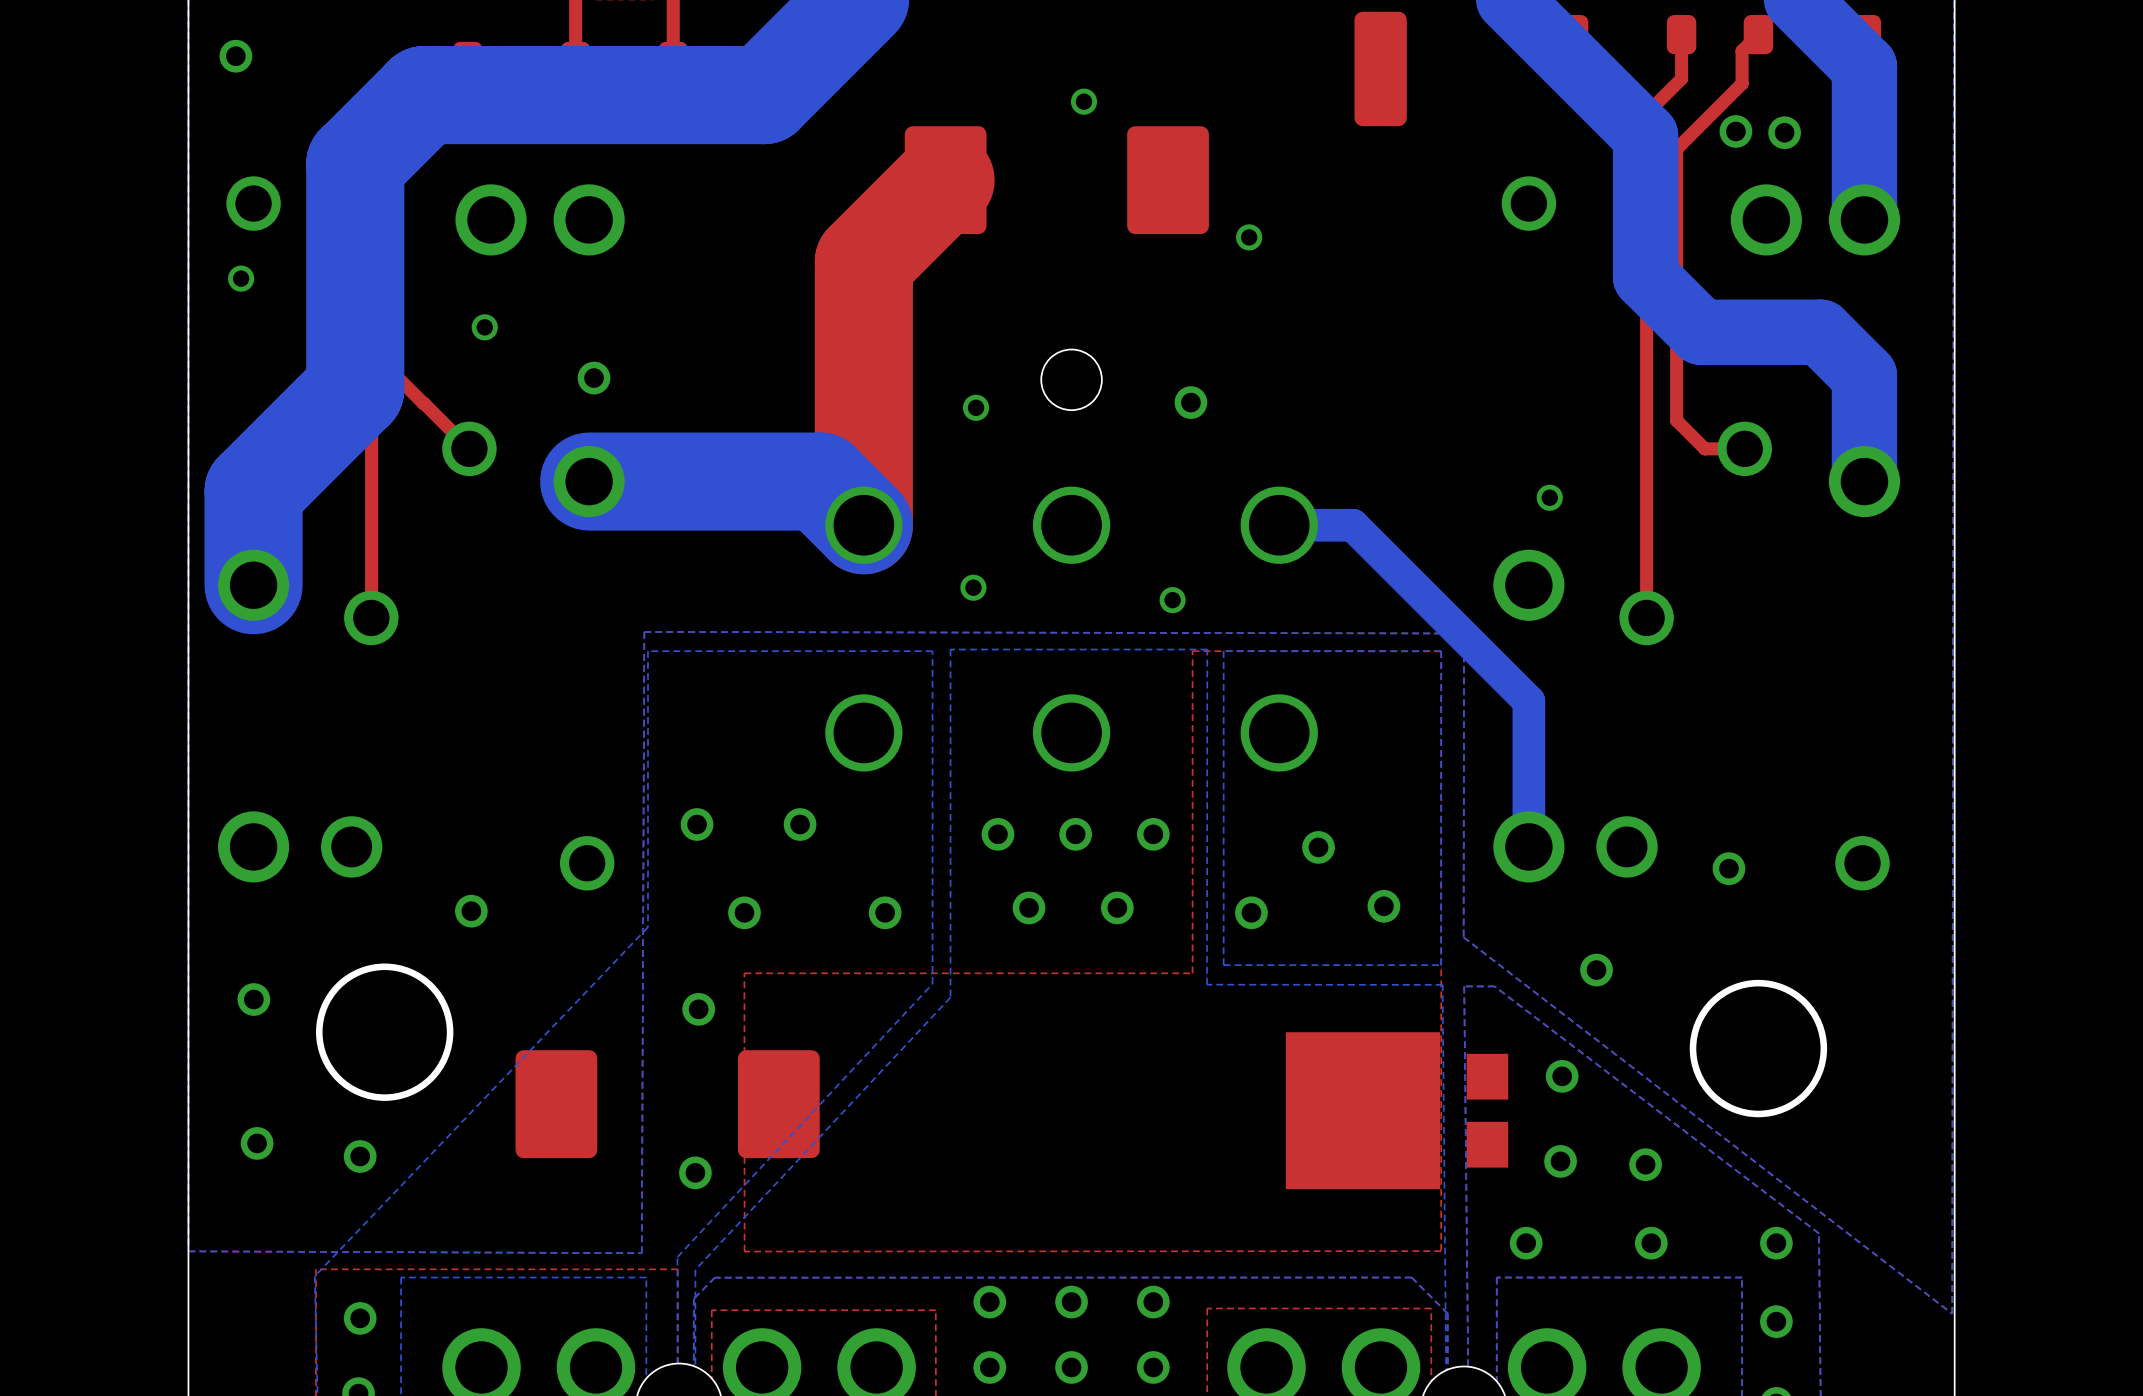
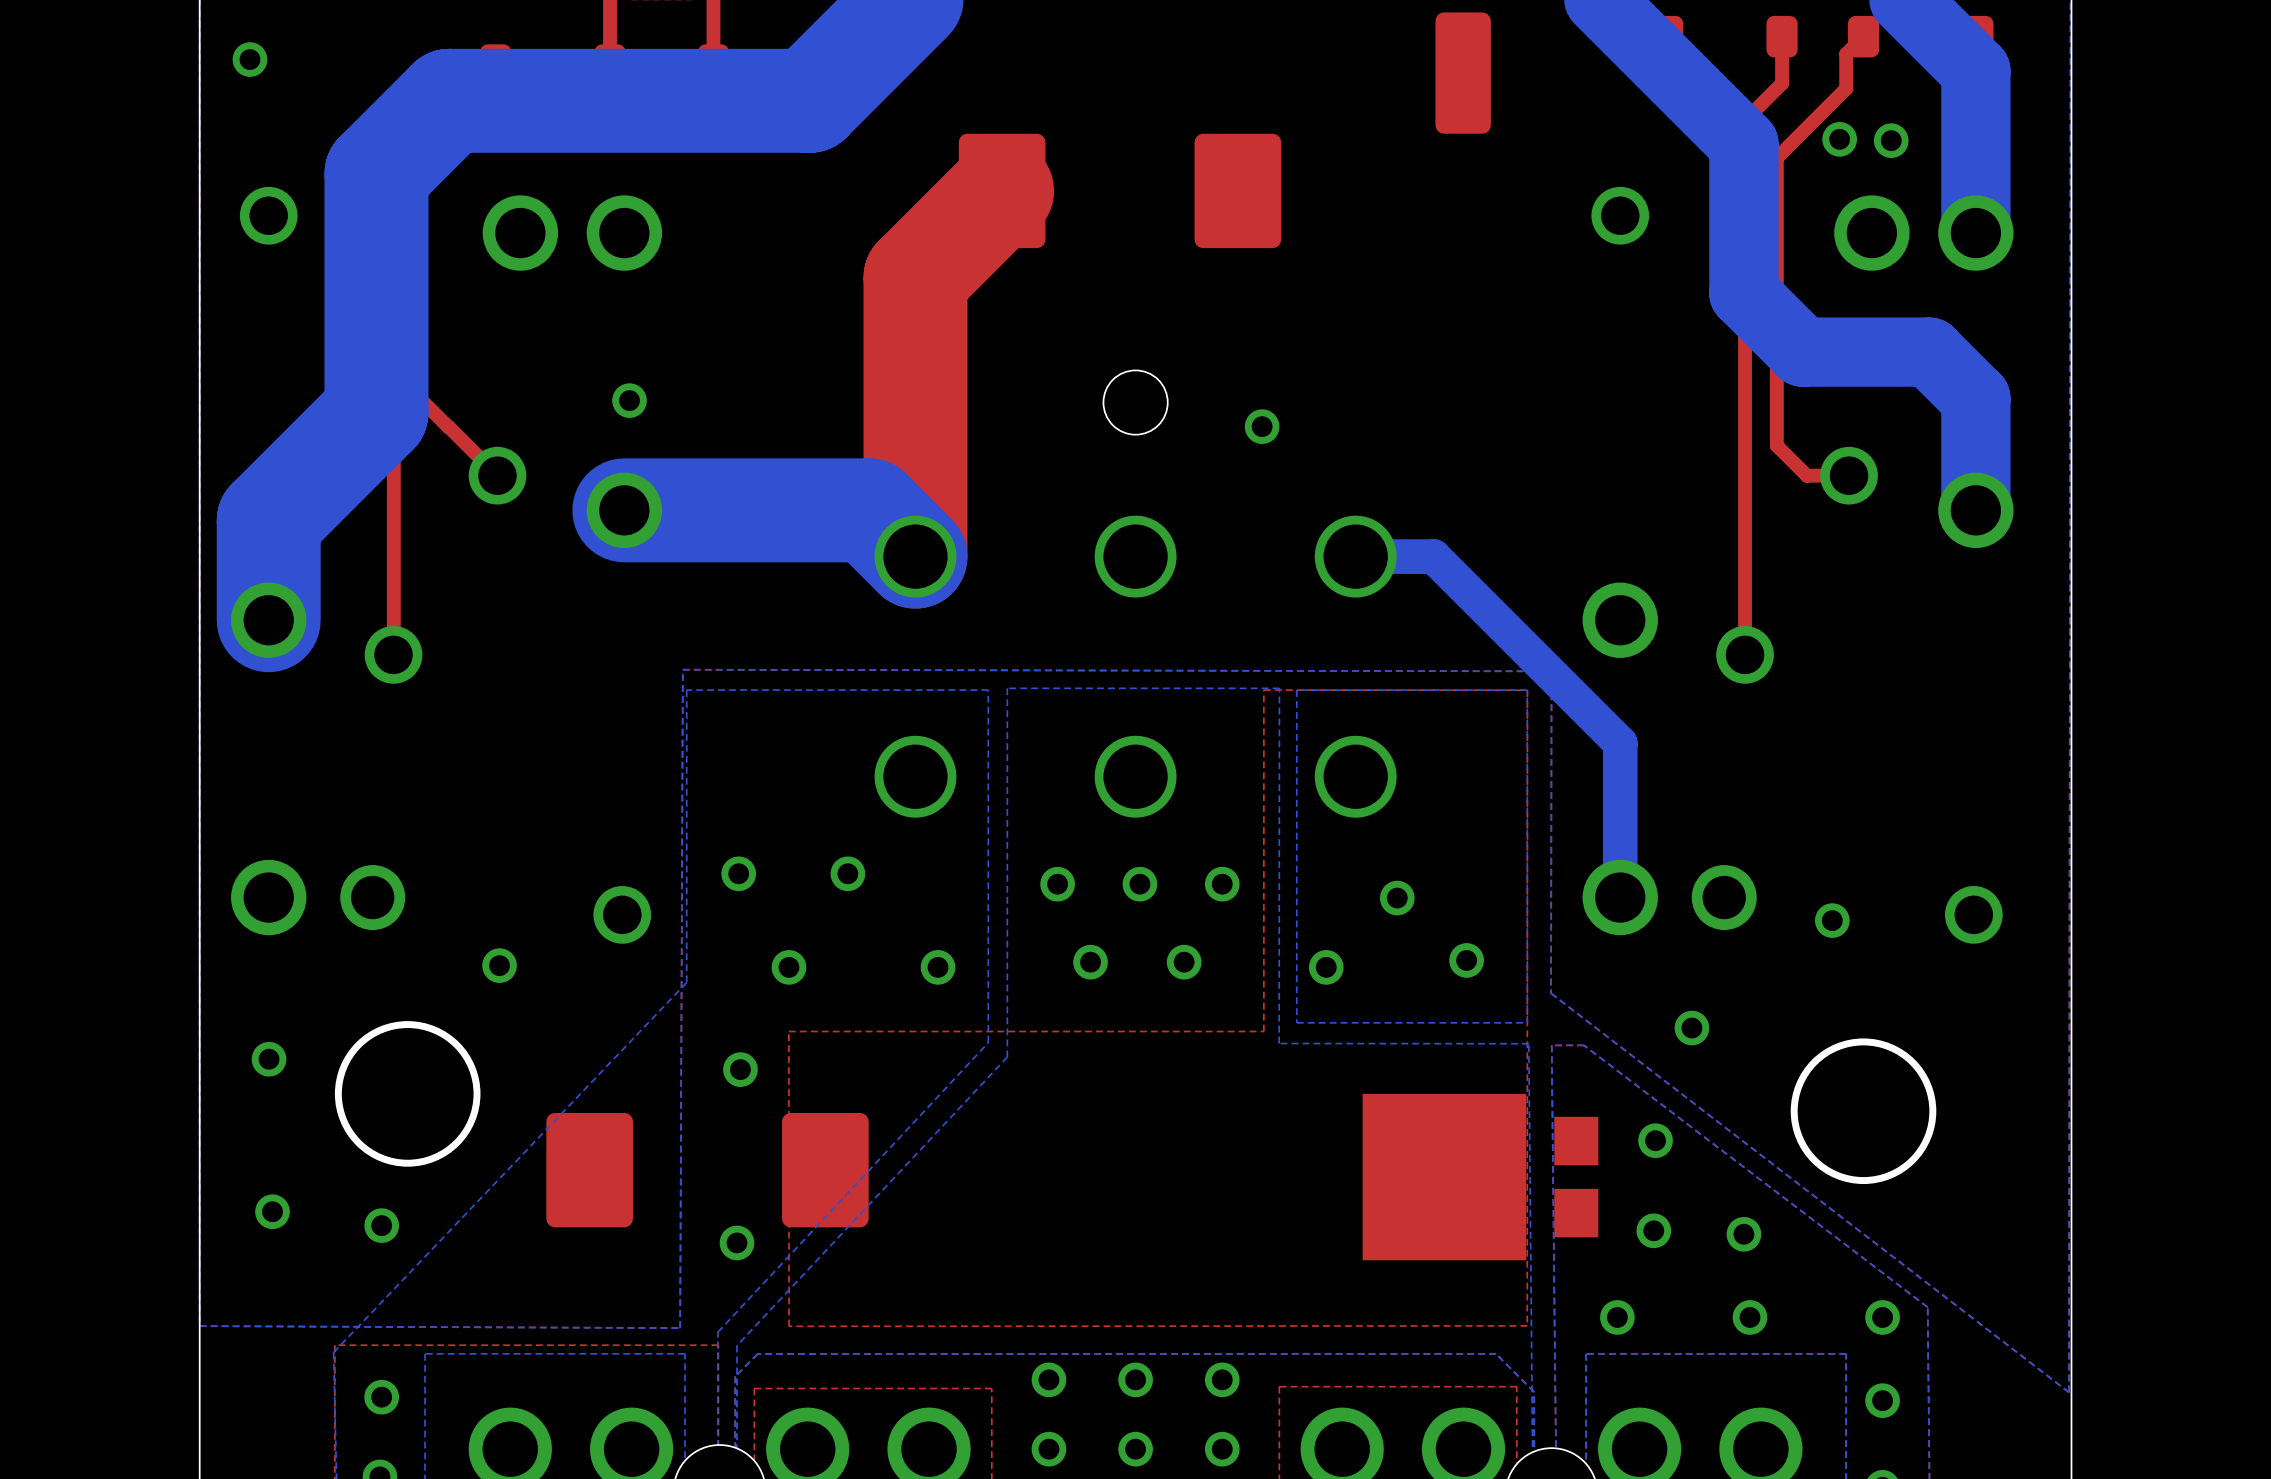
via: (1083, 101) -> none
via: (1249, 237) -> none
via: (241, 278) -> none
via: (484, 327) -> none
via: (976, 407) -> none
via: (1549, 497) -> none
via: (973, 587) -> none
via: (1172, 600) -> none

